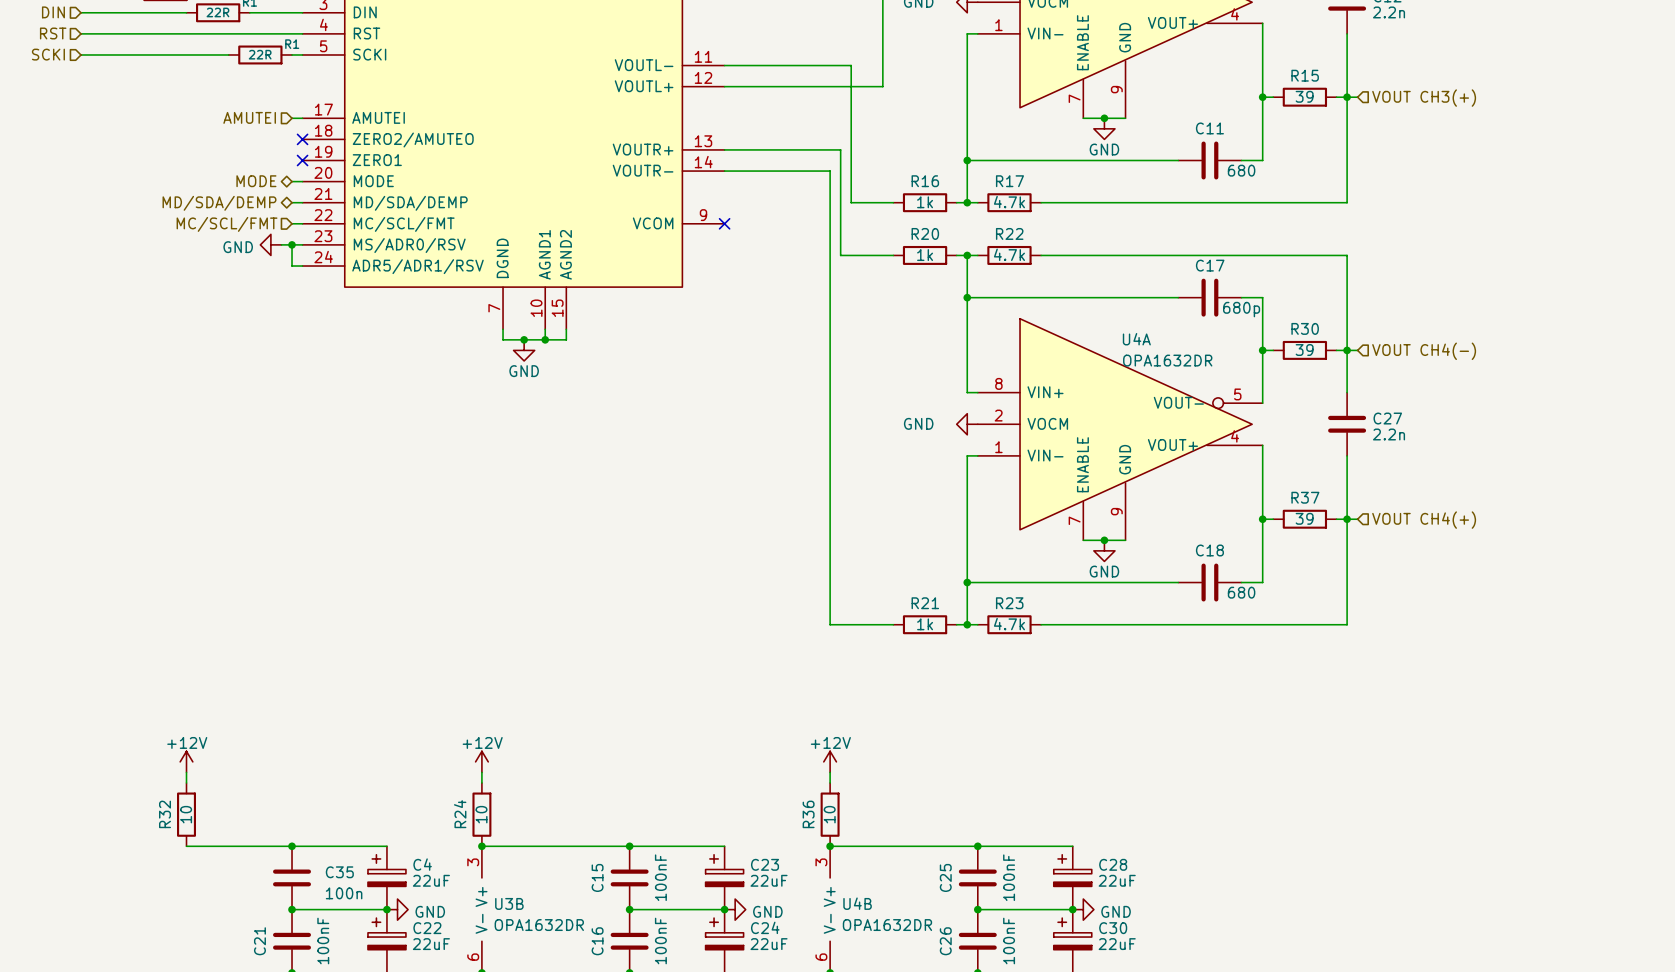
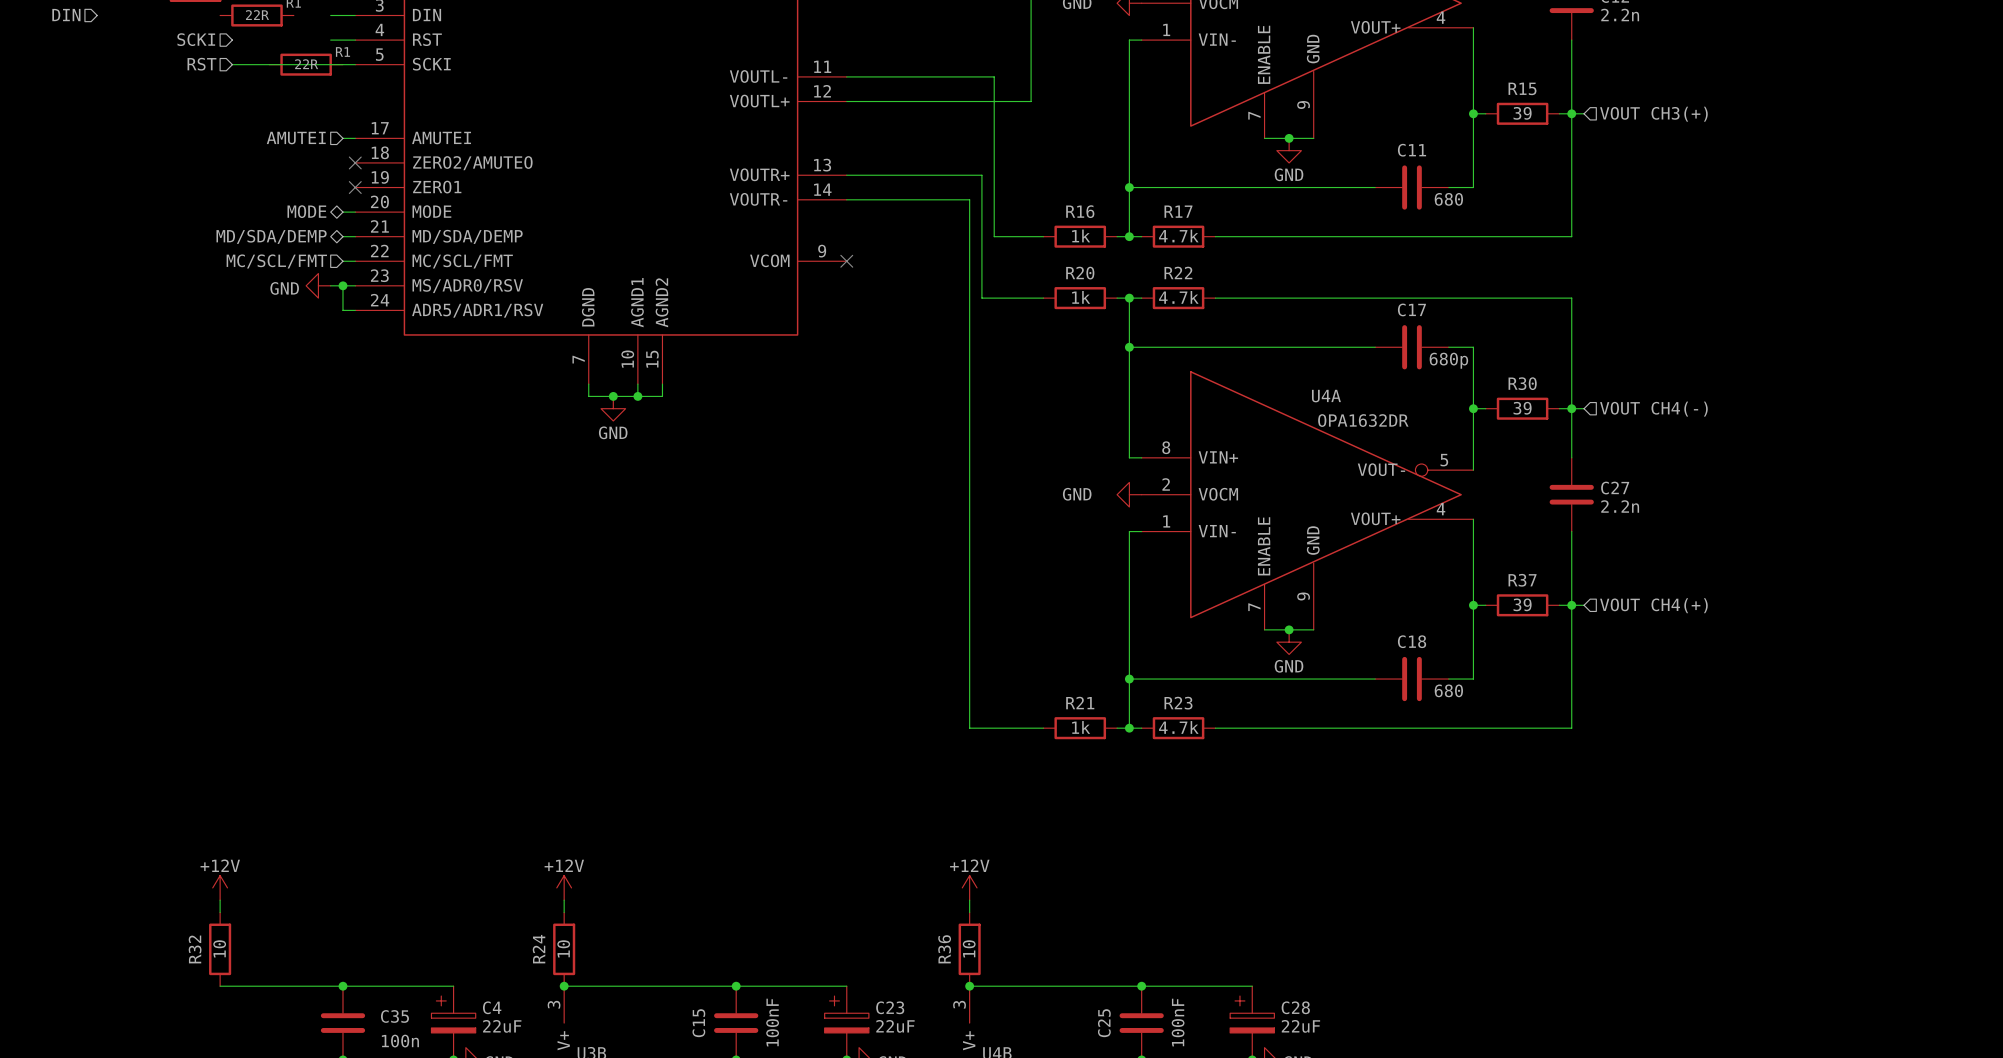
wire: (80, 12) (186, 12) -> none
wire: (249, 12) (281, 12) -> none
hierarchical label position: RST (53, 33) -> RST (201, 64)
wire: (80, 33) (281, 33) -> none
hierarchical label position: SCKI (48, 54) -> SCKI (196, 39)
wire: (80, 54) (197, 54) -> none
wire: none -> (269, 64) (342, 64)

